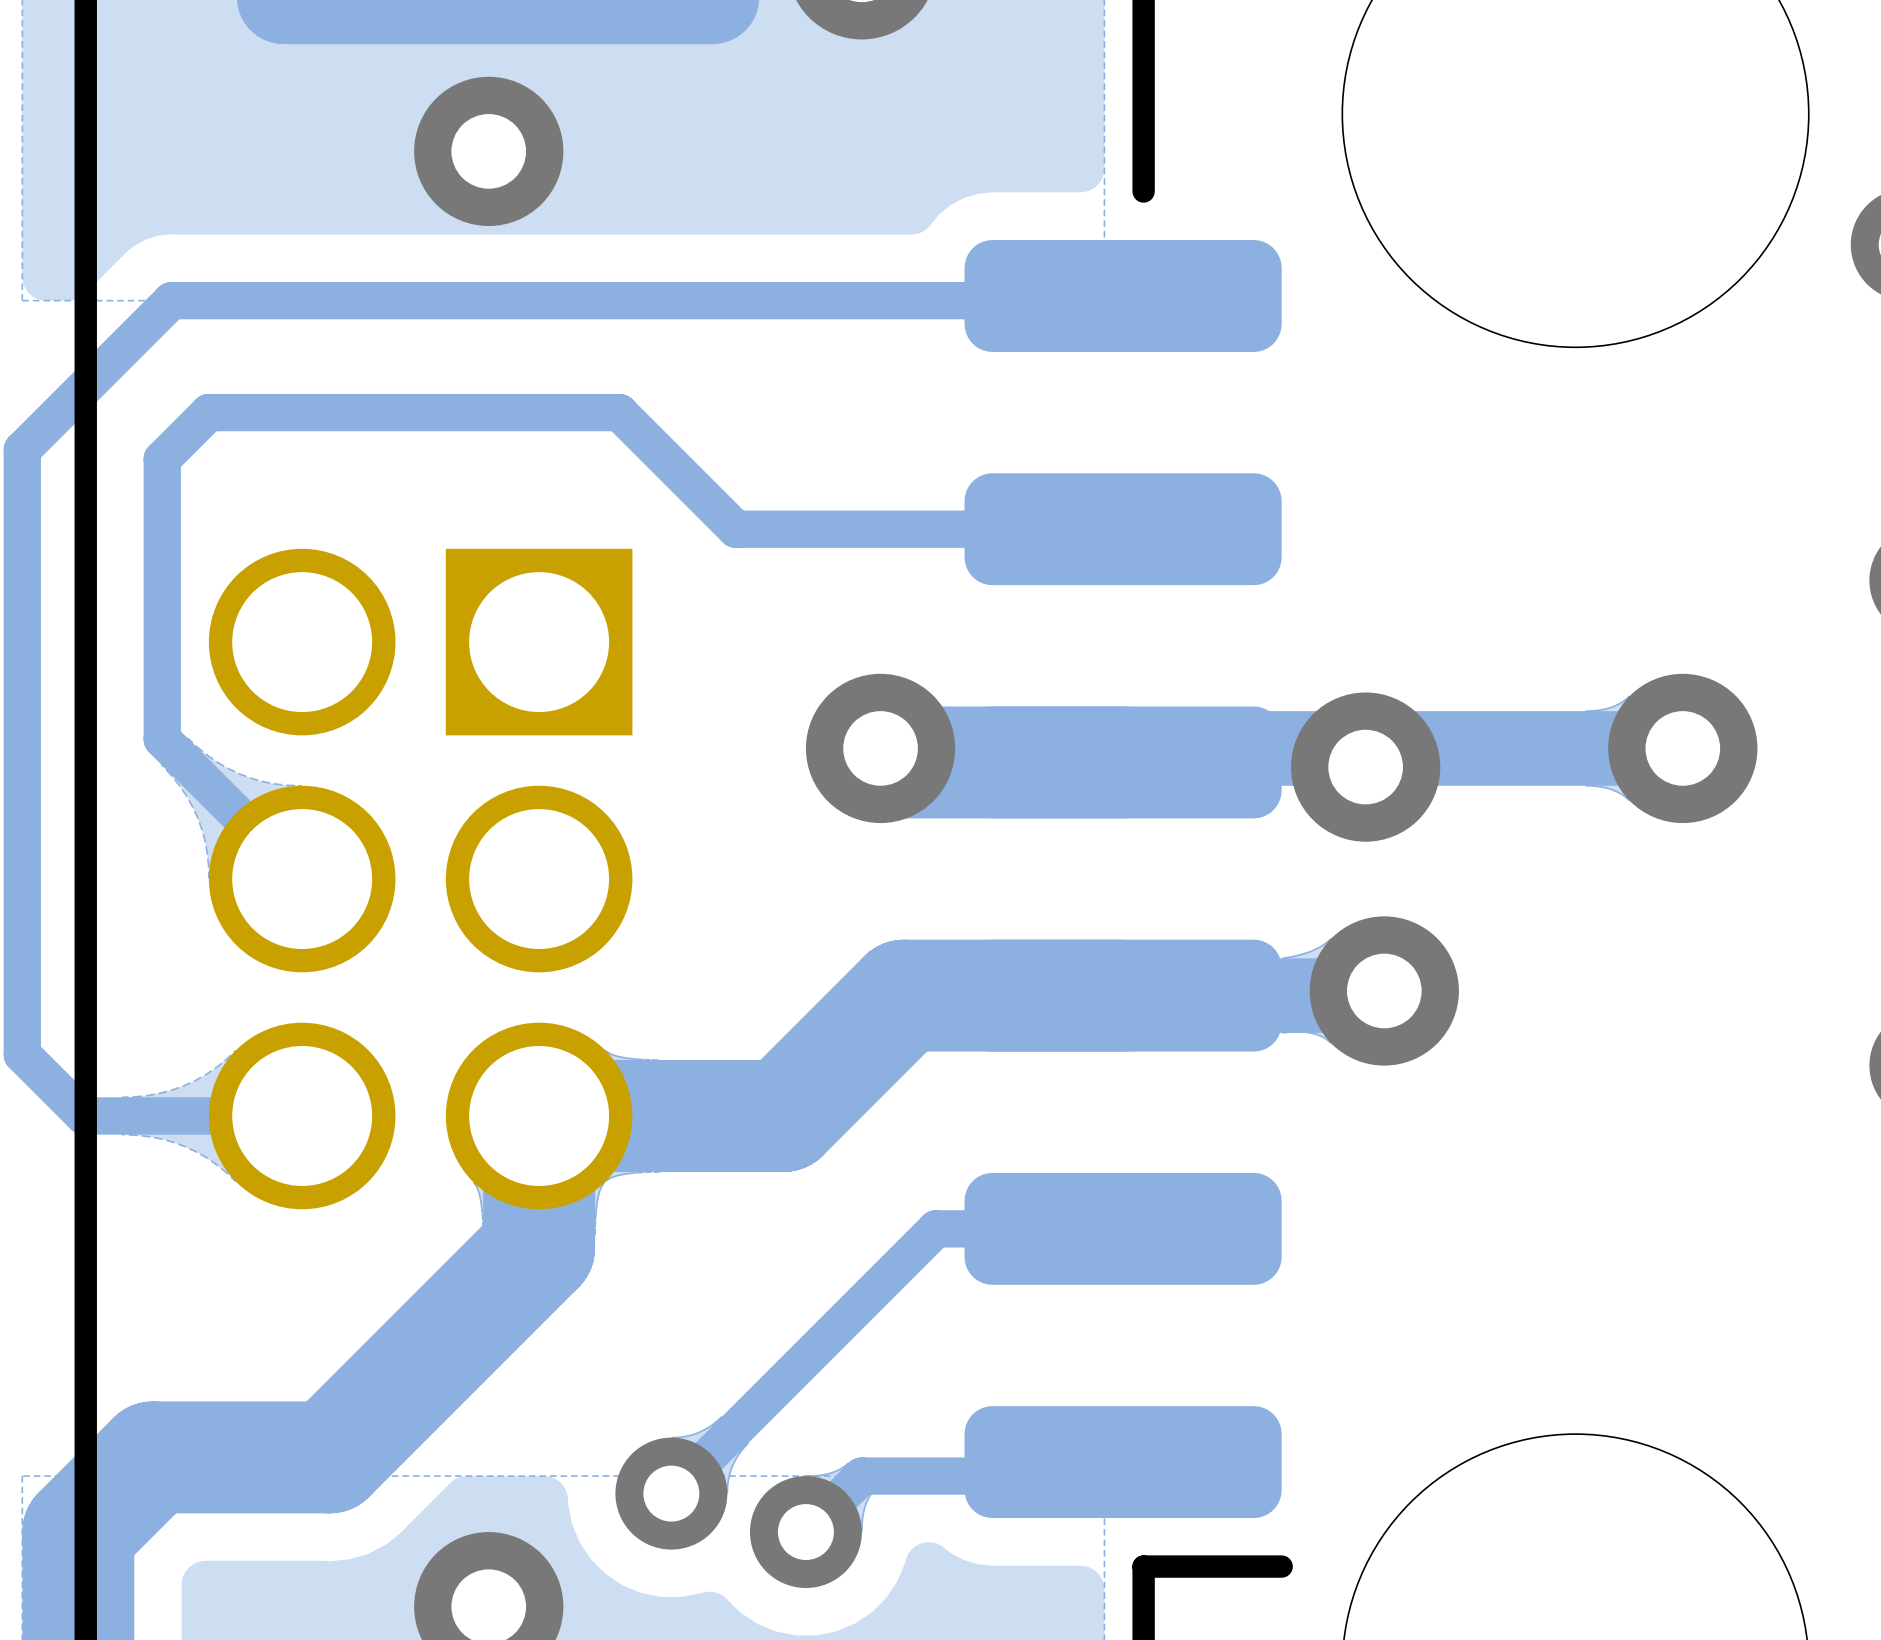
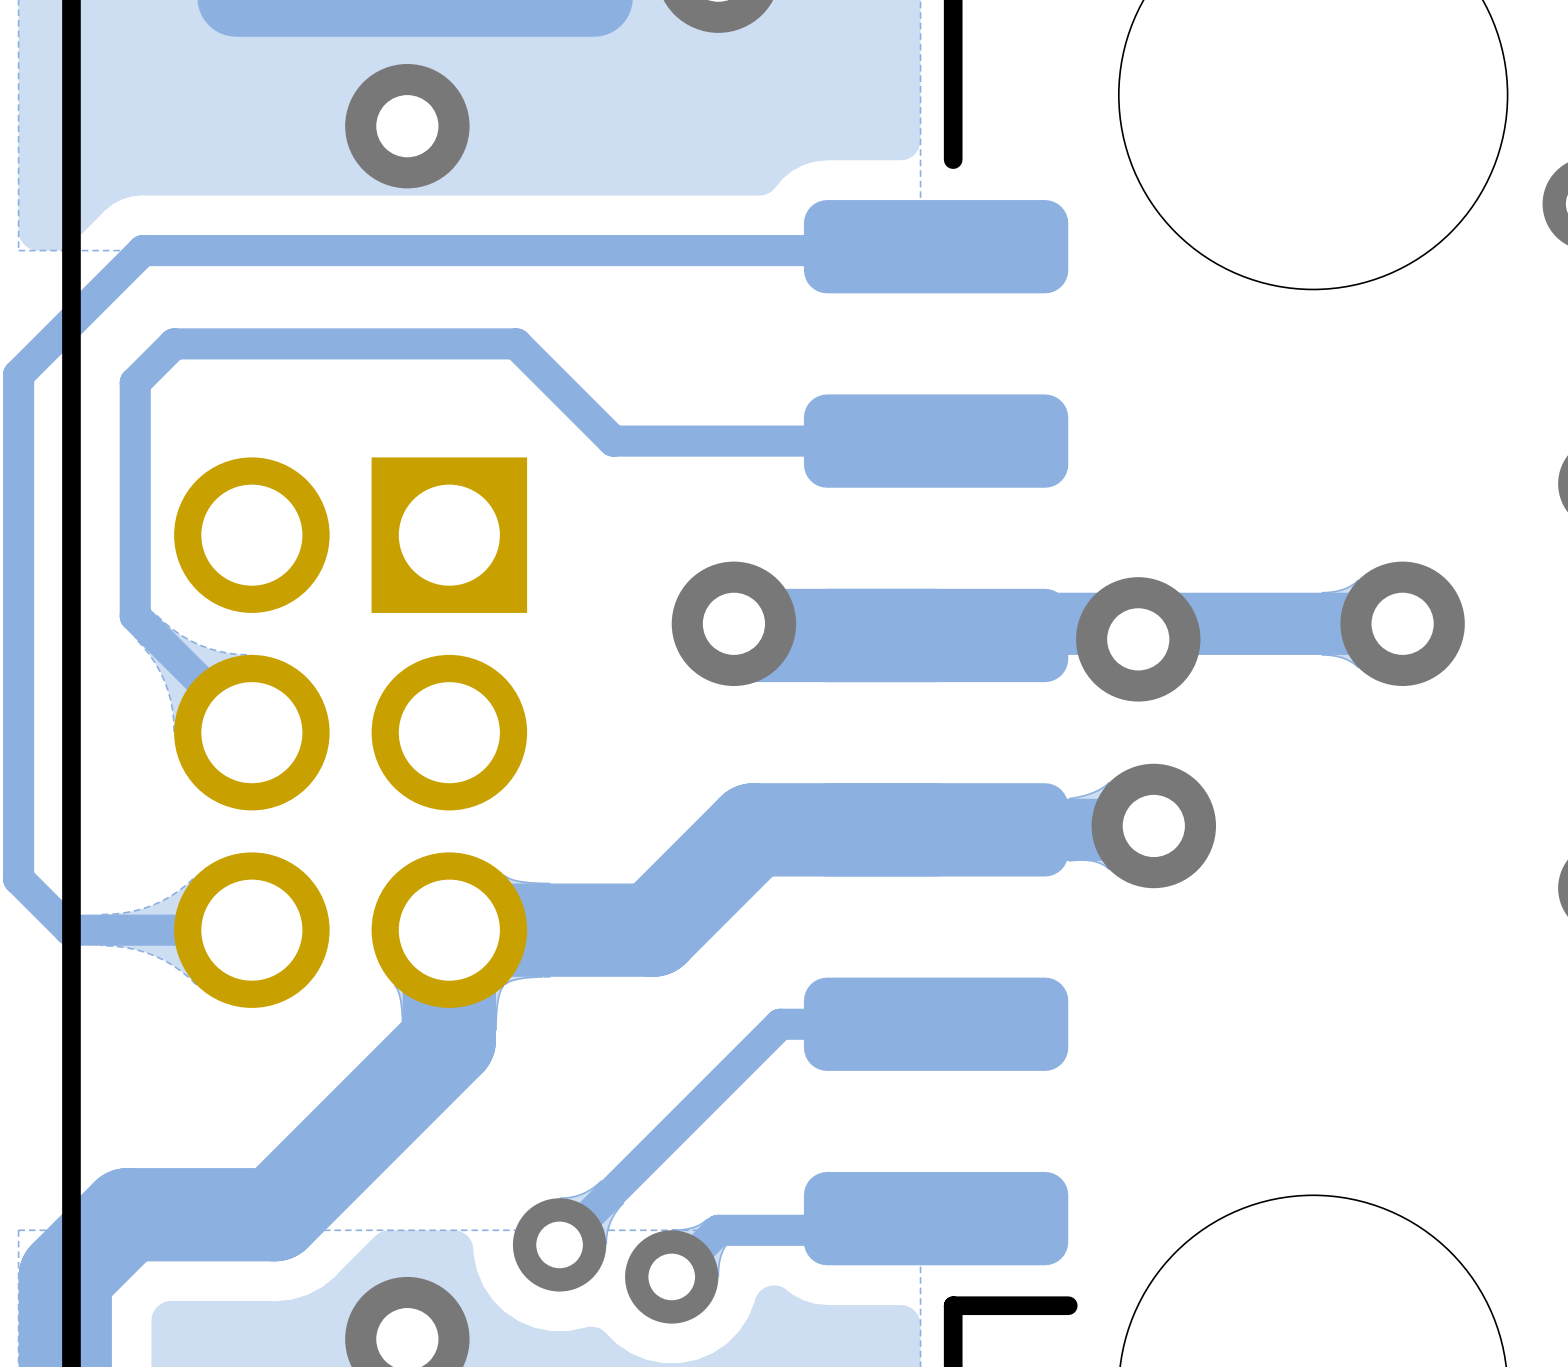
part footprint: [208, 548, 633, 1210] -> [174, 457, 528, 1008]

